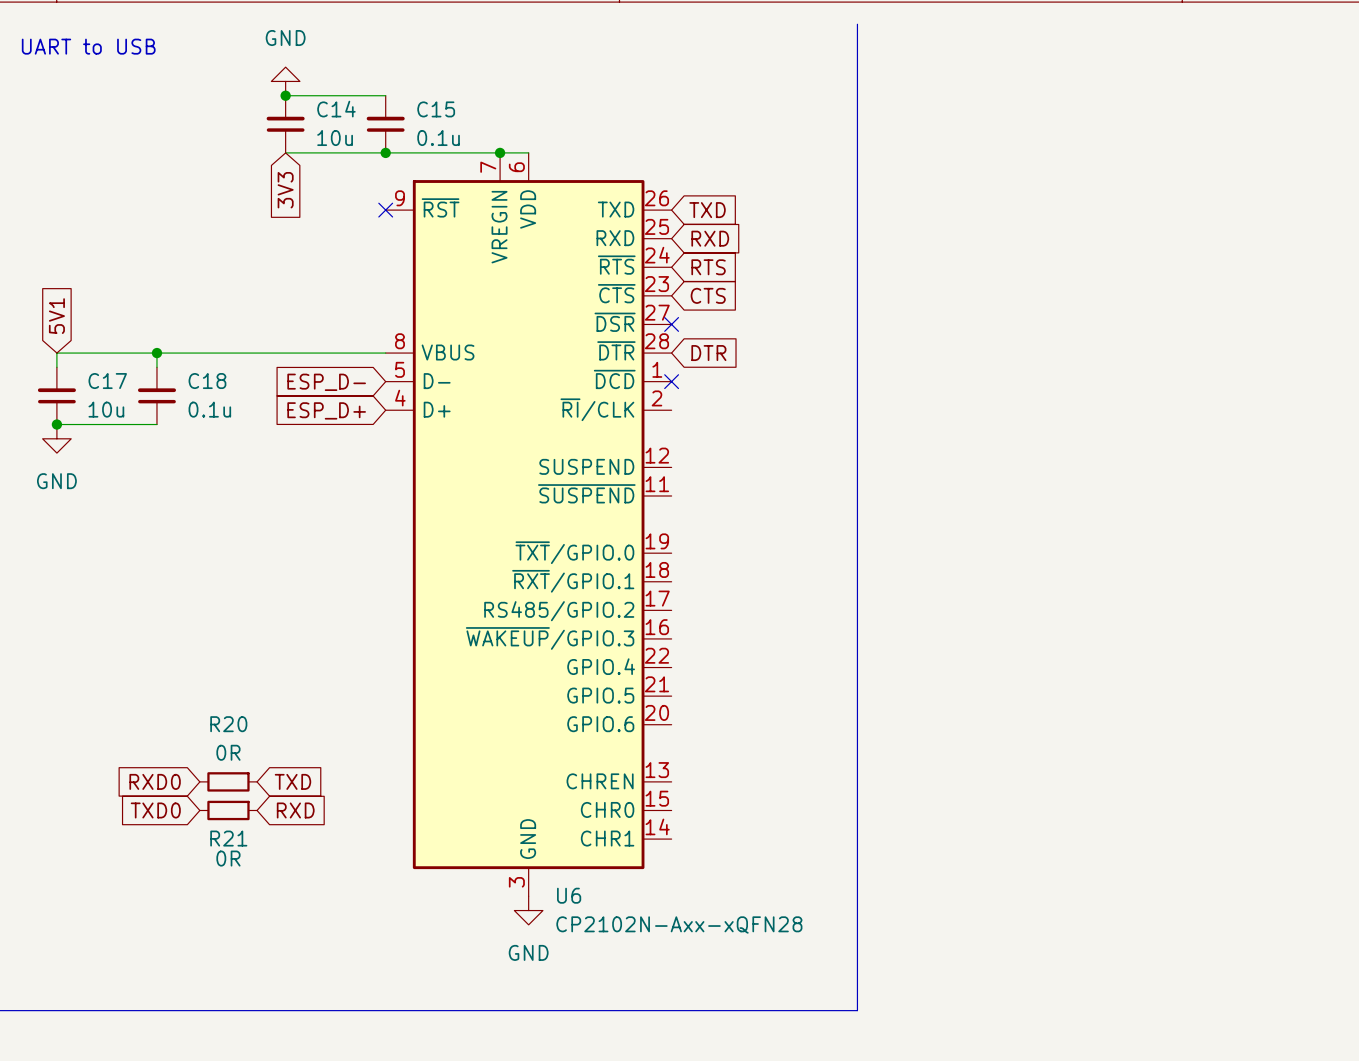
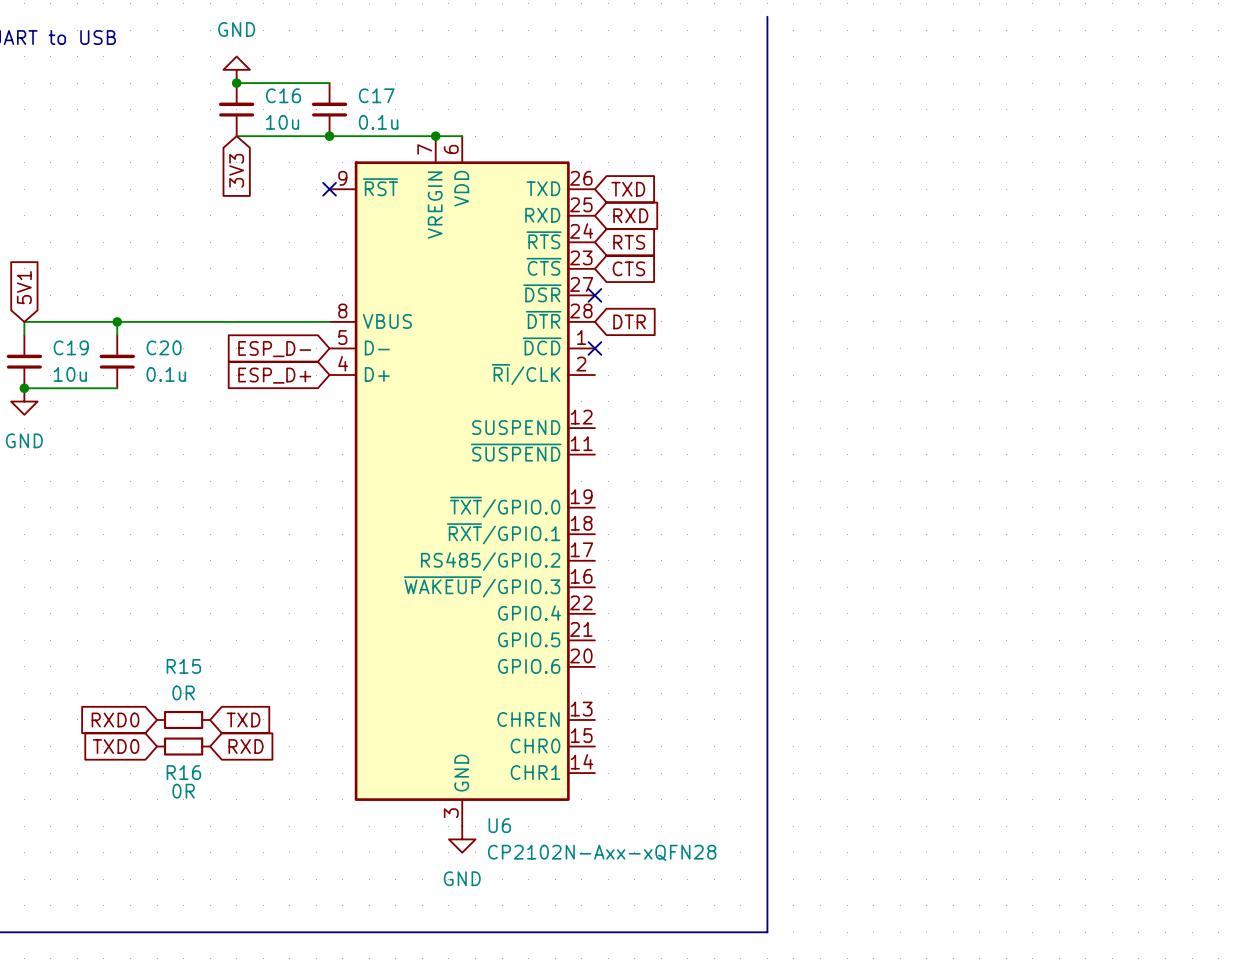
C14 name: C14 (336, 109) -> C16 (283, 95)
C15 name: C15 (436, 109) -> C17 (376, 95)
C17 name: C17 (107, 381) -> C19 (71, 347)
C18 name: C18 (207, 381) -> C20 (164, 347)
R20 name: R20 (228, 724) -> R15 (183, 666)
R21 name: R21 (228, 838) -> R16 (183, 772)

